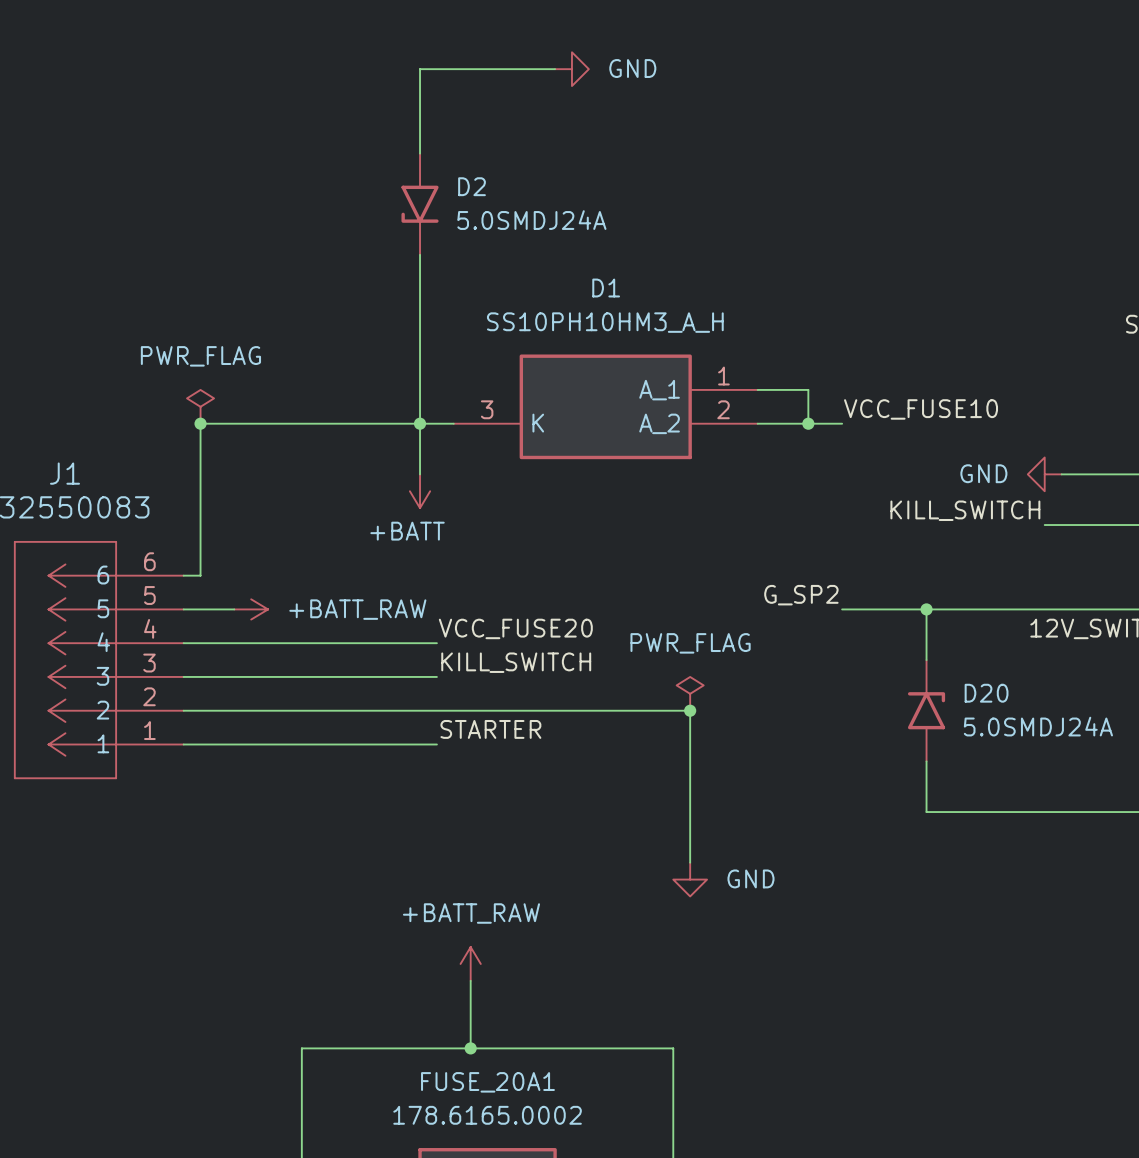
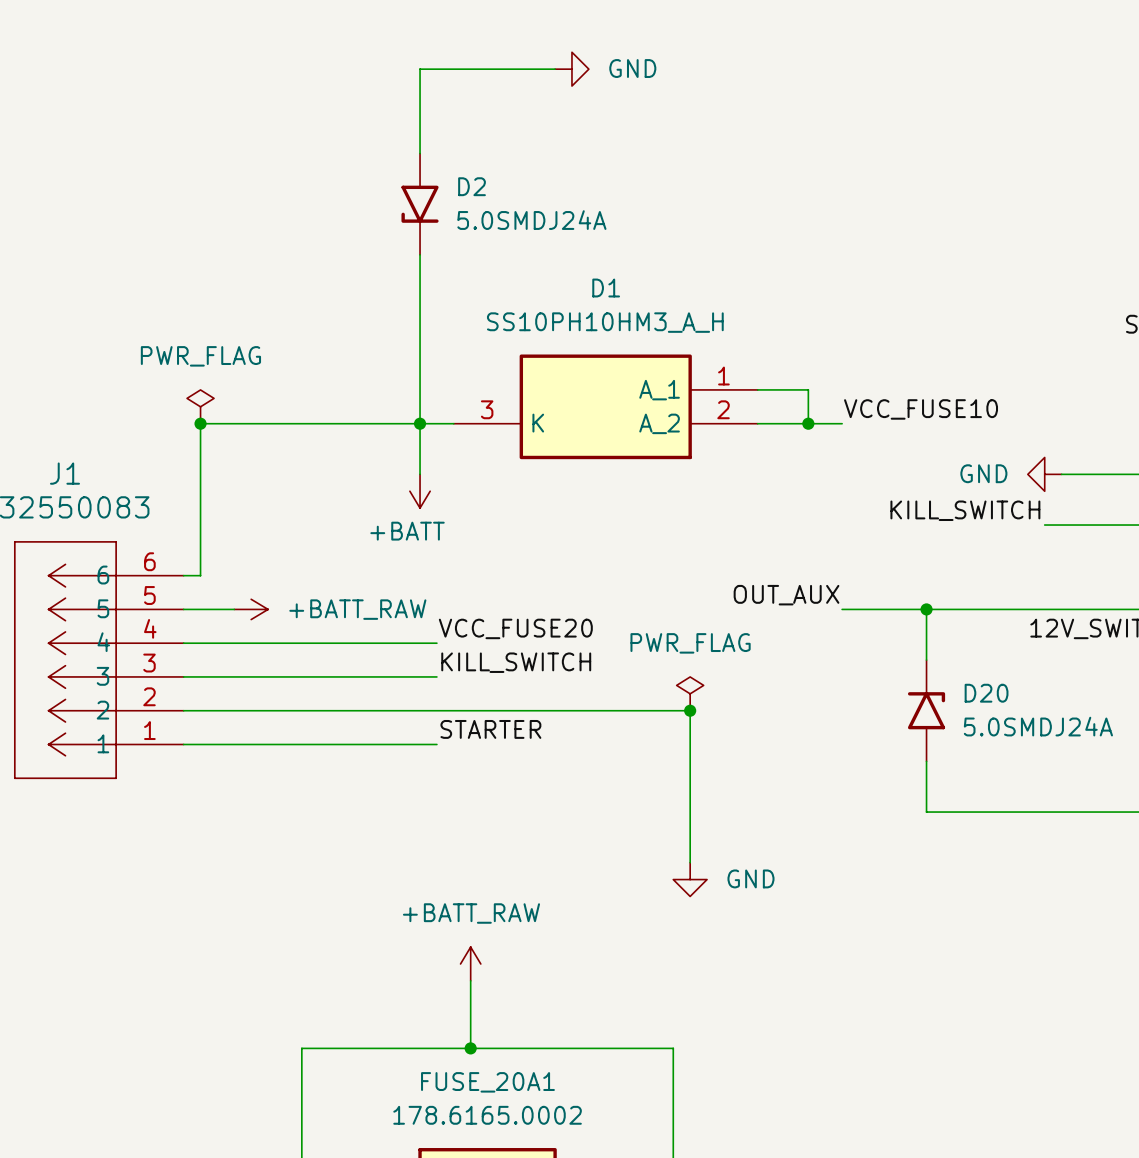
label: G_SP2 (801, 595) -> OUT_AUX (786, 595)

